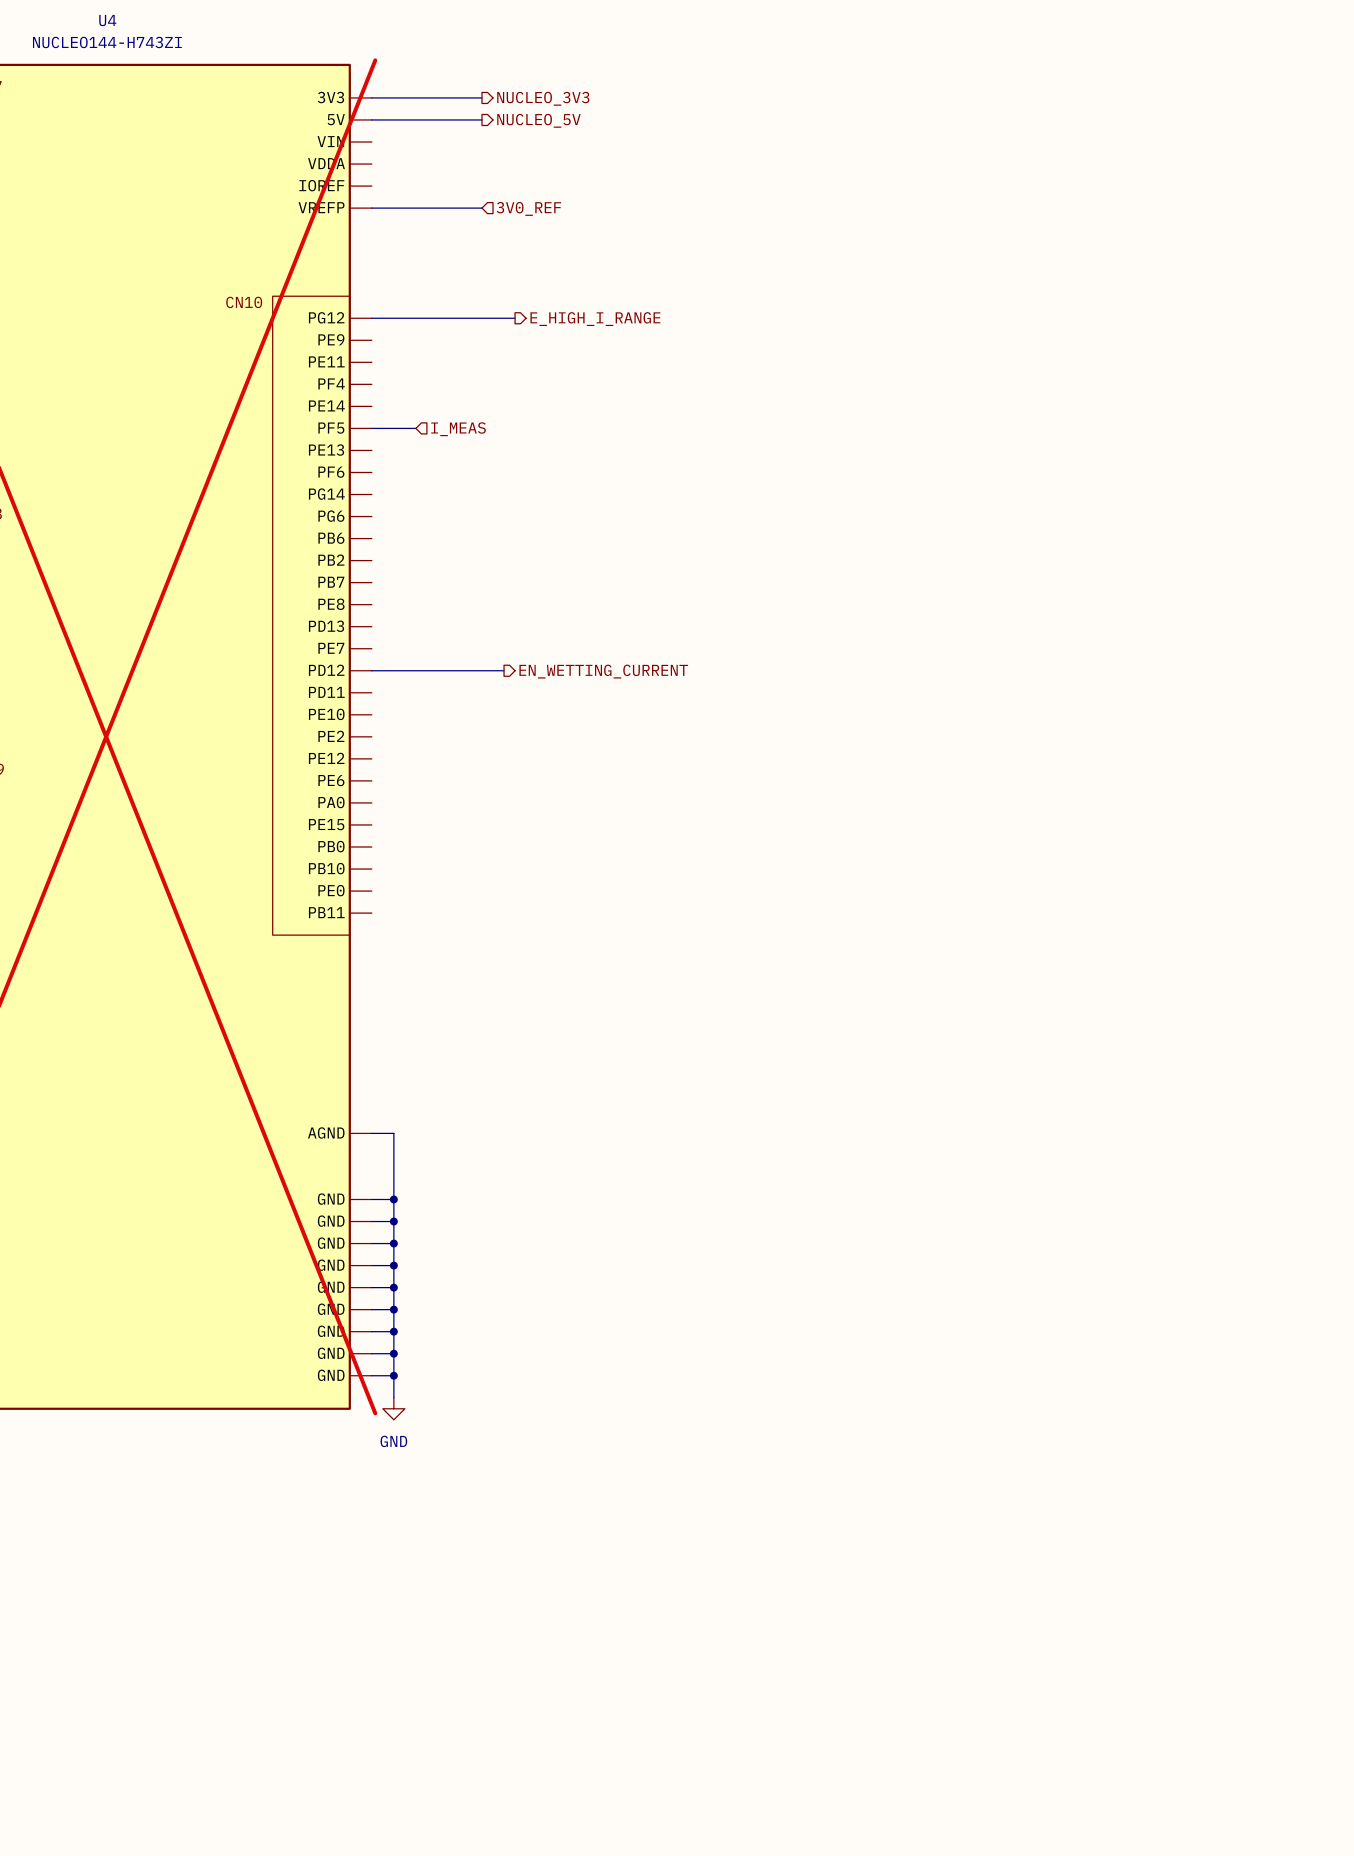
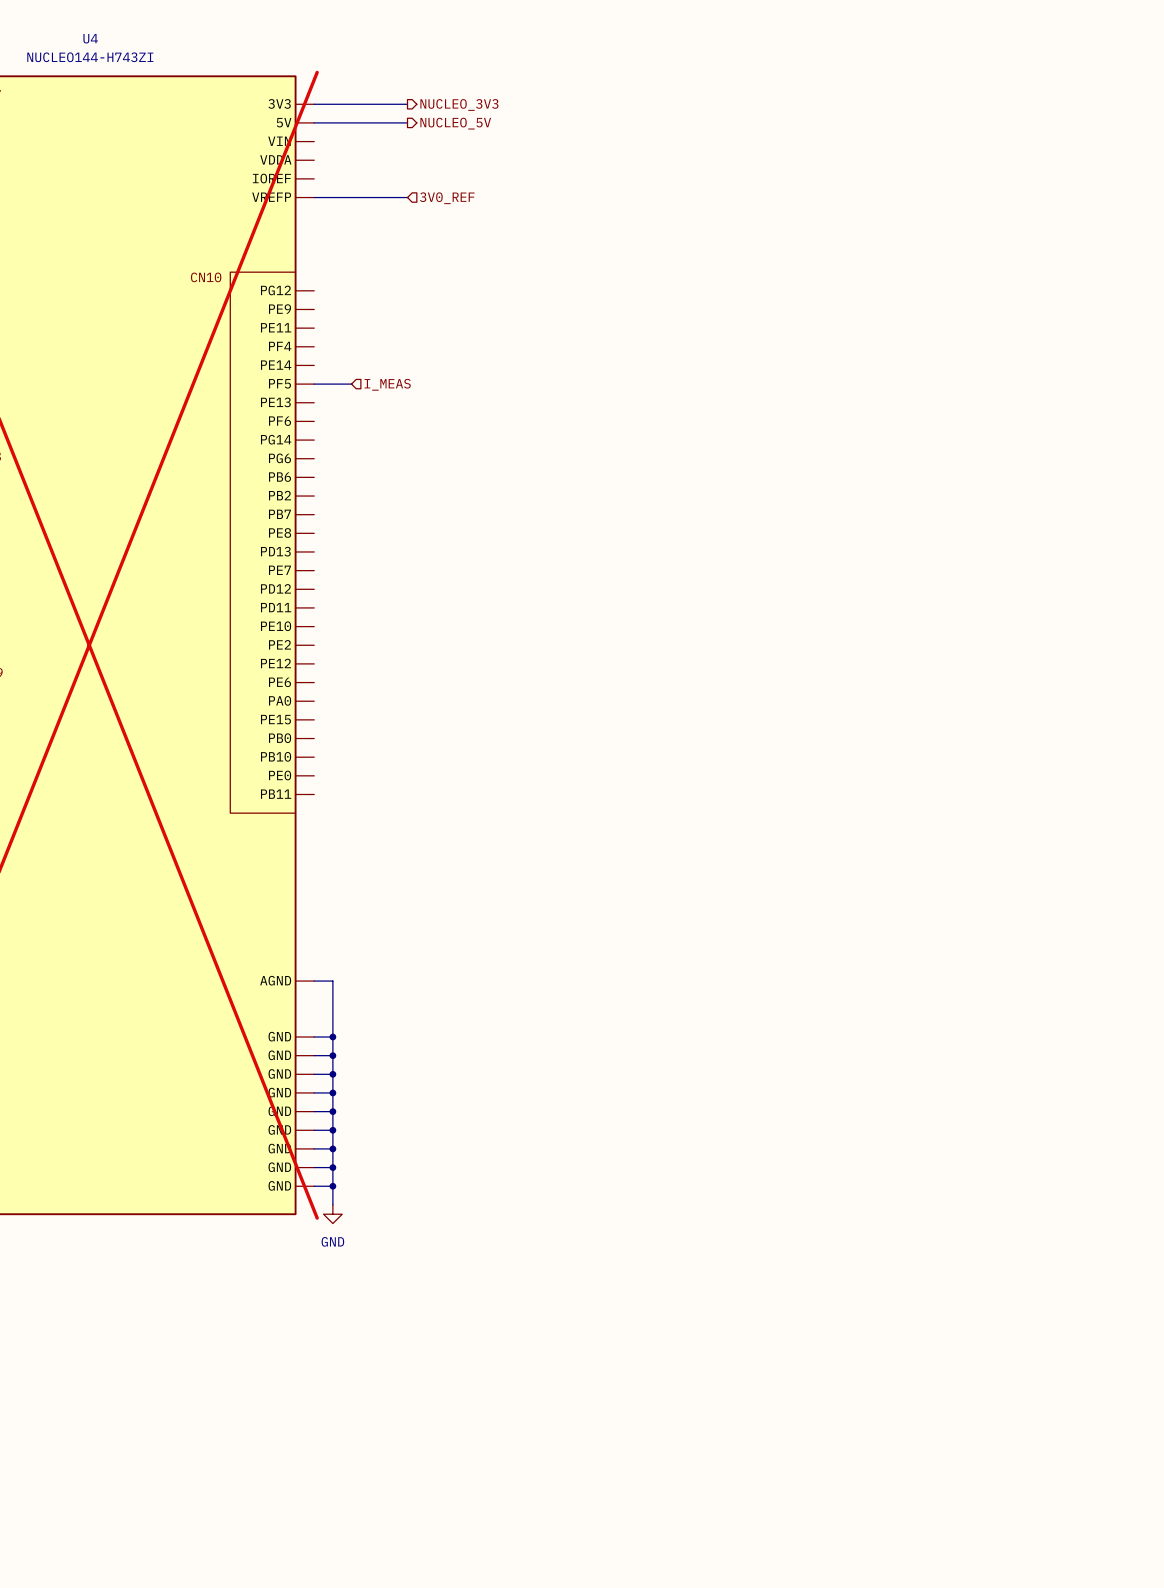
wire: (371, 318) (515, 318) -> none
hierarchical label: E_HIGH_I_RANGE (595, 319) -> none
wire: (371, 670) (504, 670) -> none
hierarchical label: EN_WETTING_CURRENT (603, 671) -> none

